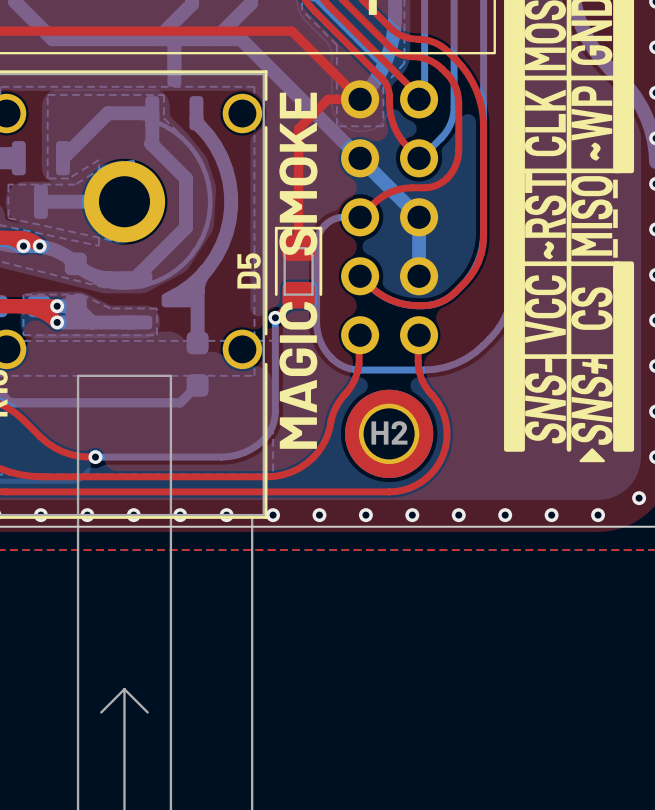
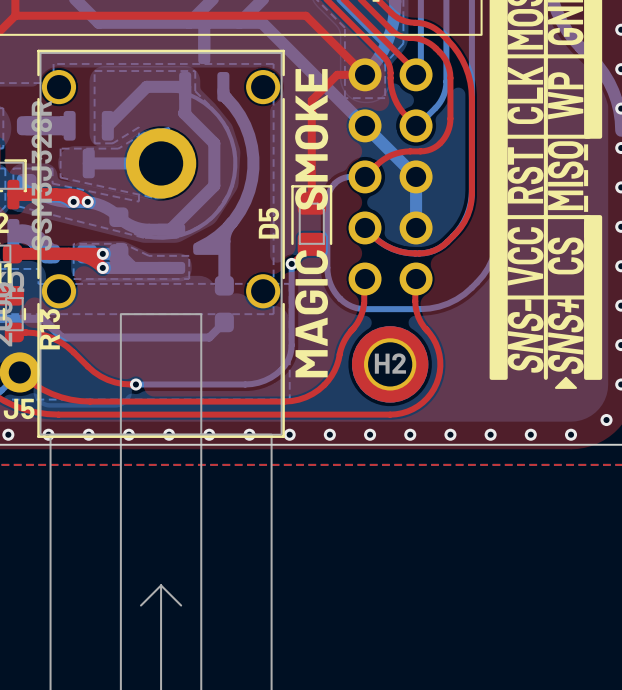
text: ~WP (591, 123) -> WP (565, 95)
text: ~RST (545, 216) -> RST (525, 175)

